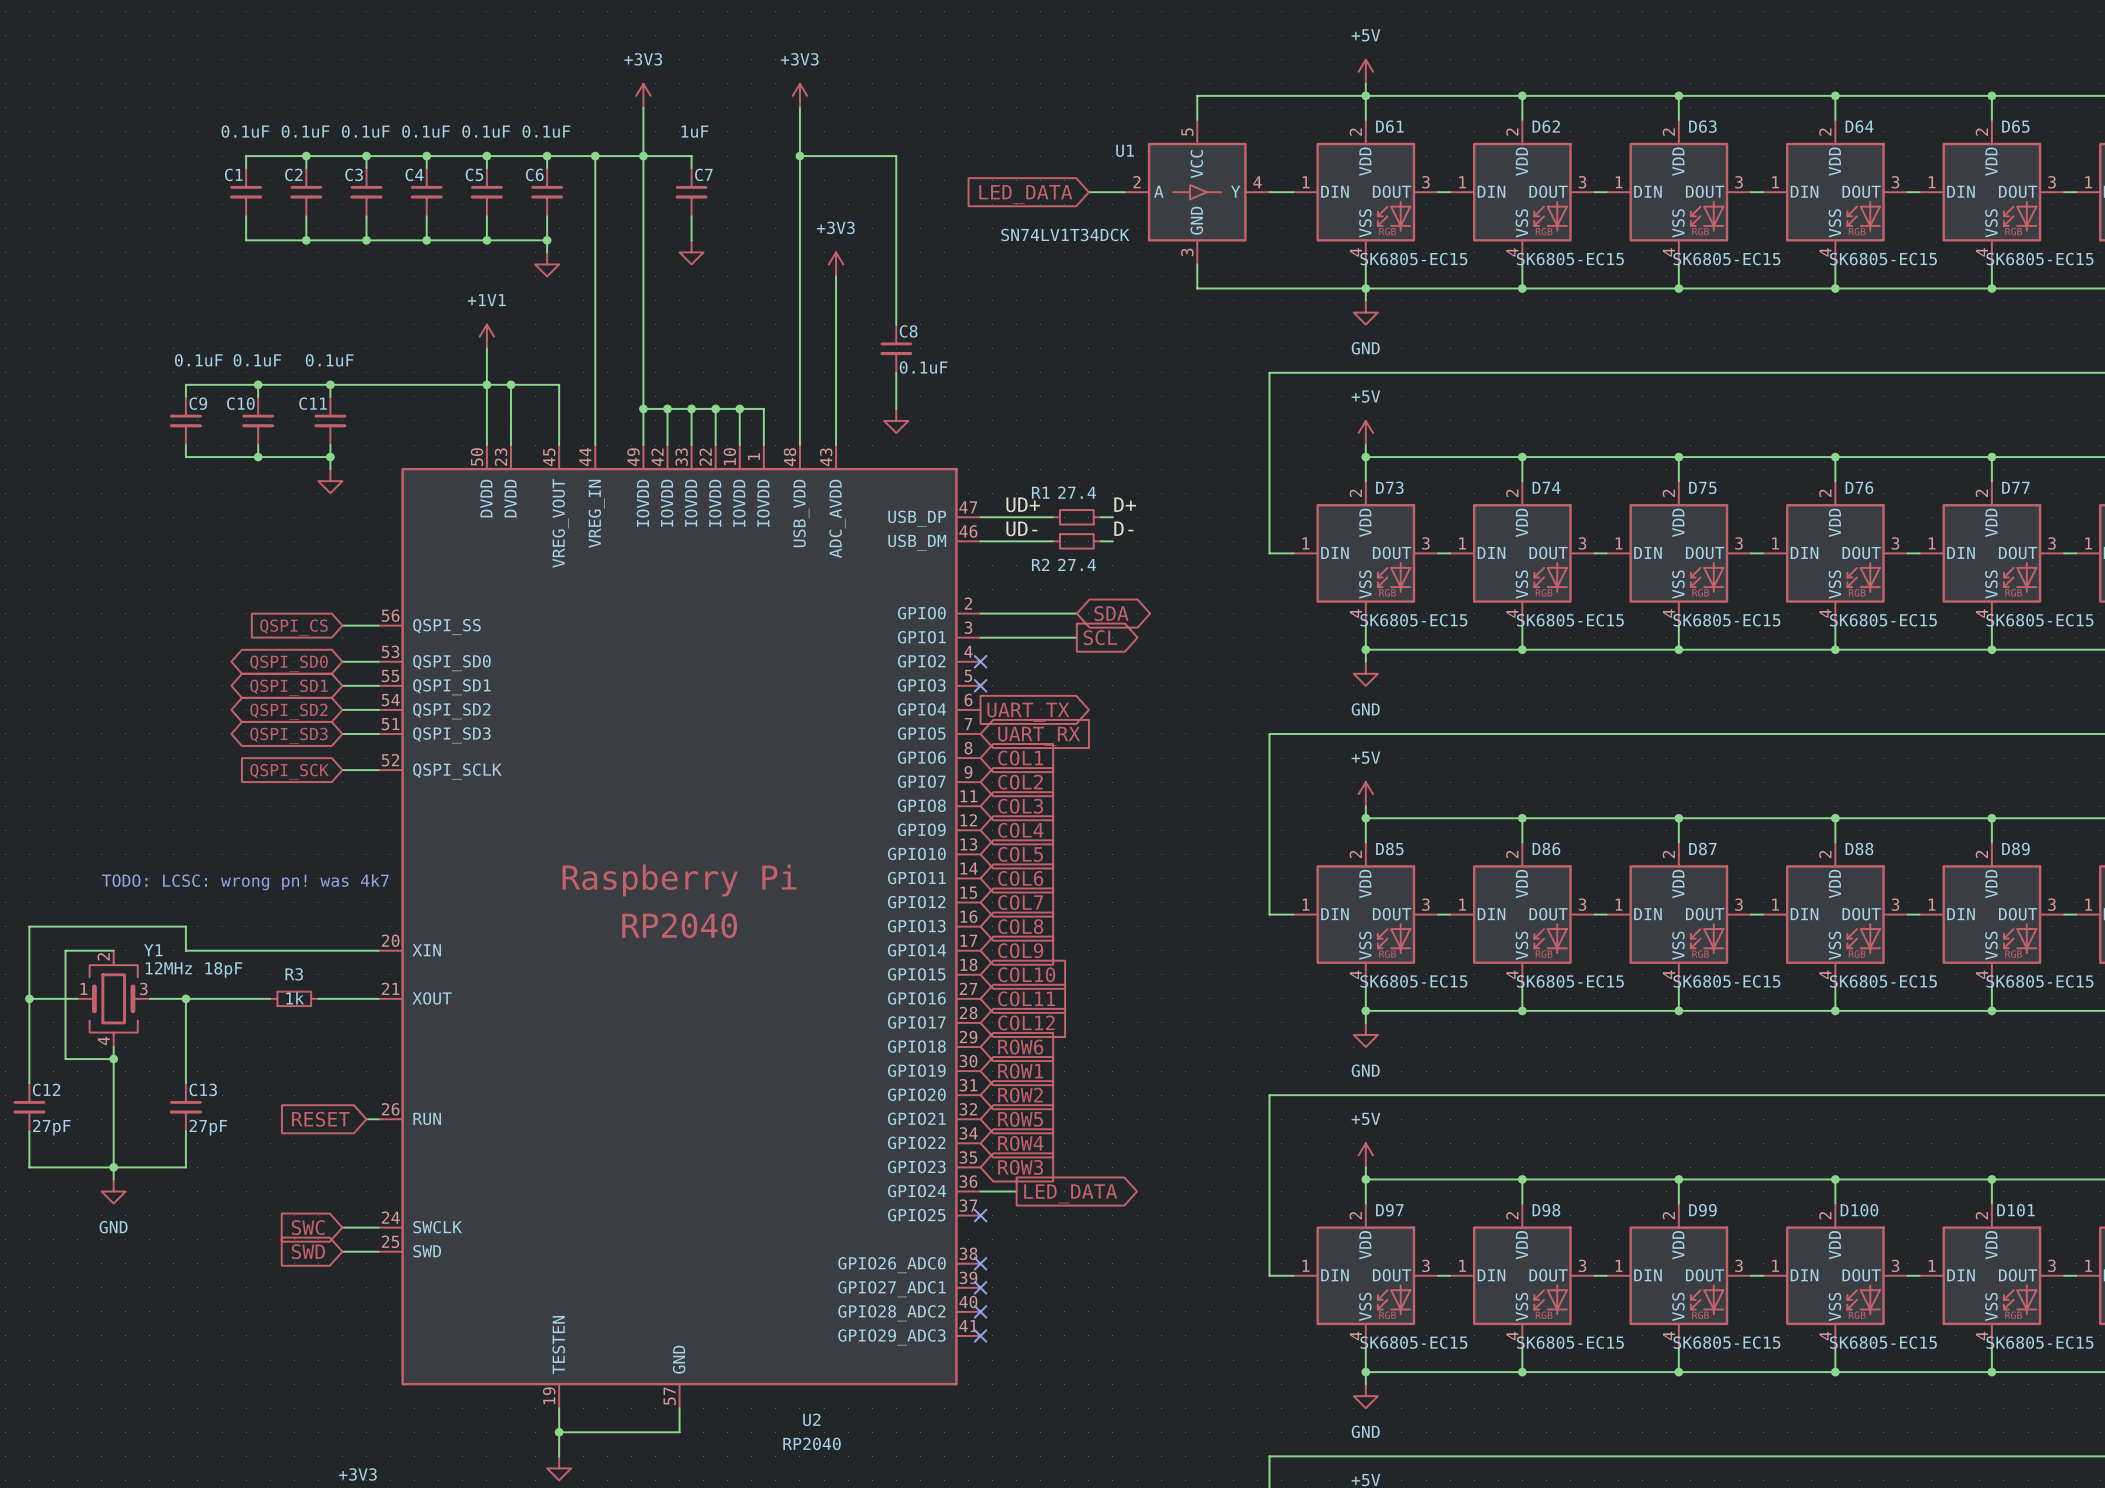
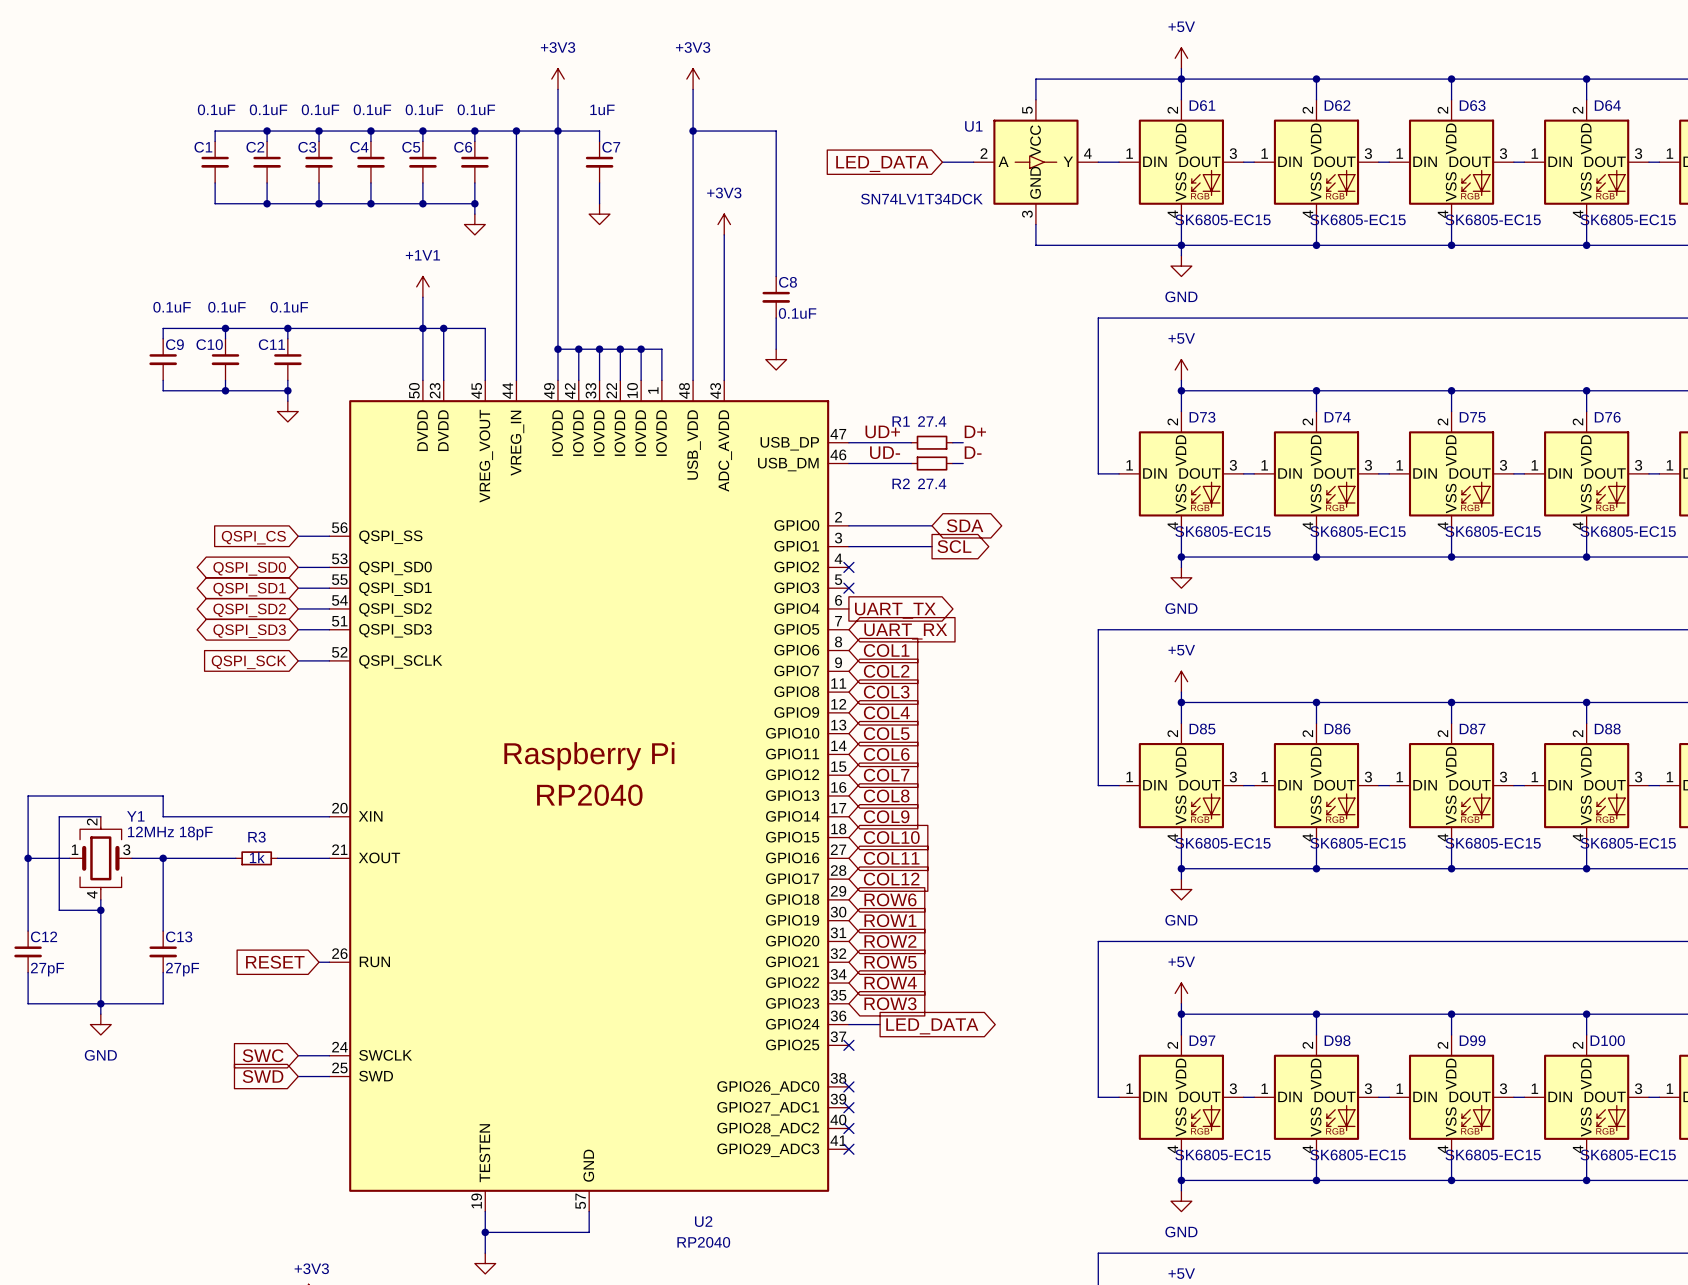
text: TODO: LCSC: wrong pn! was 4k7 (245, 882) -> none

